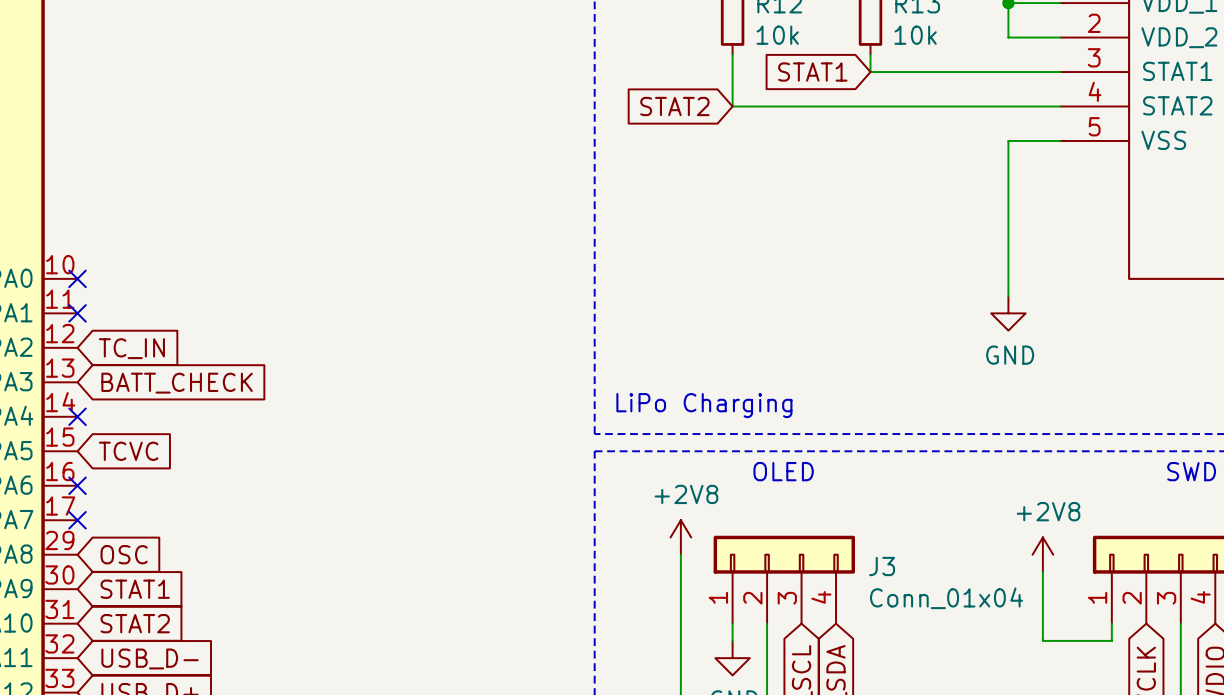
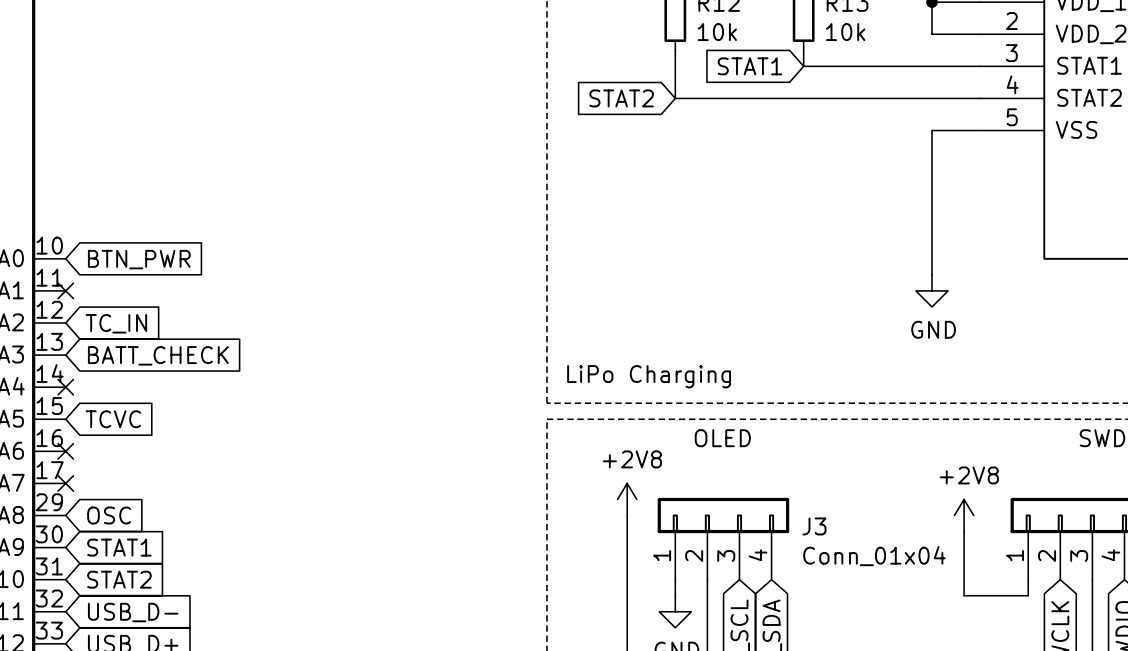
no-connect mark: (77, 278) -> none
global label: none -> BTN_PWR (139, 259)

